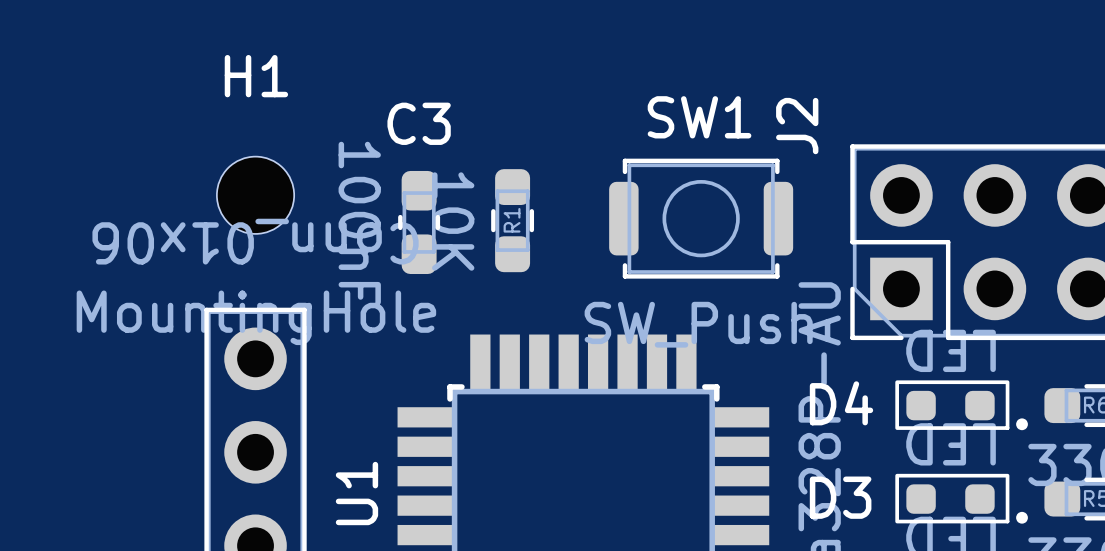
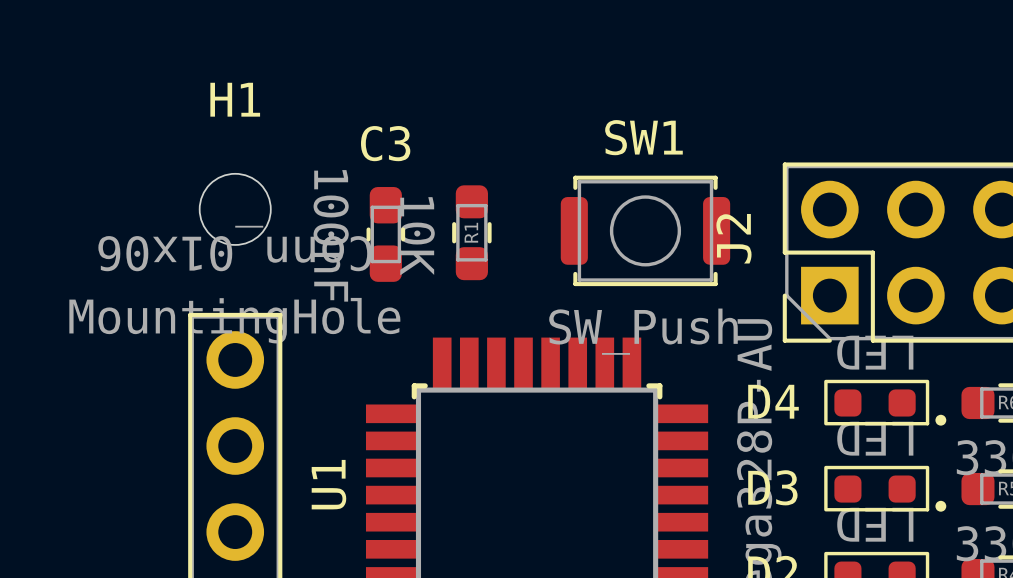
J2 name position: J2 (797, 126) -> J2 (733, 238)

